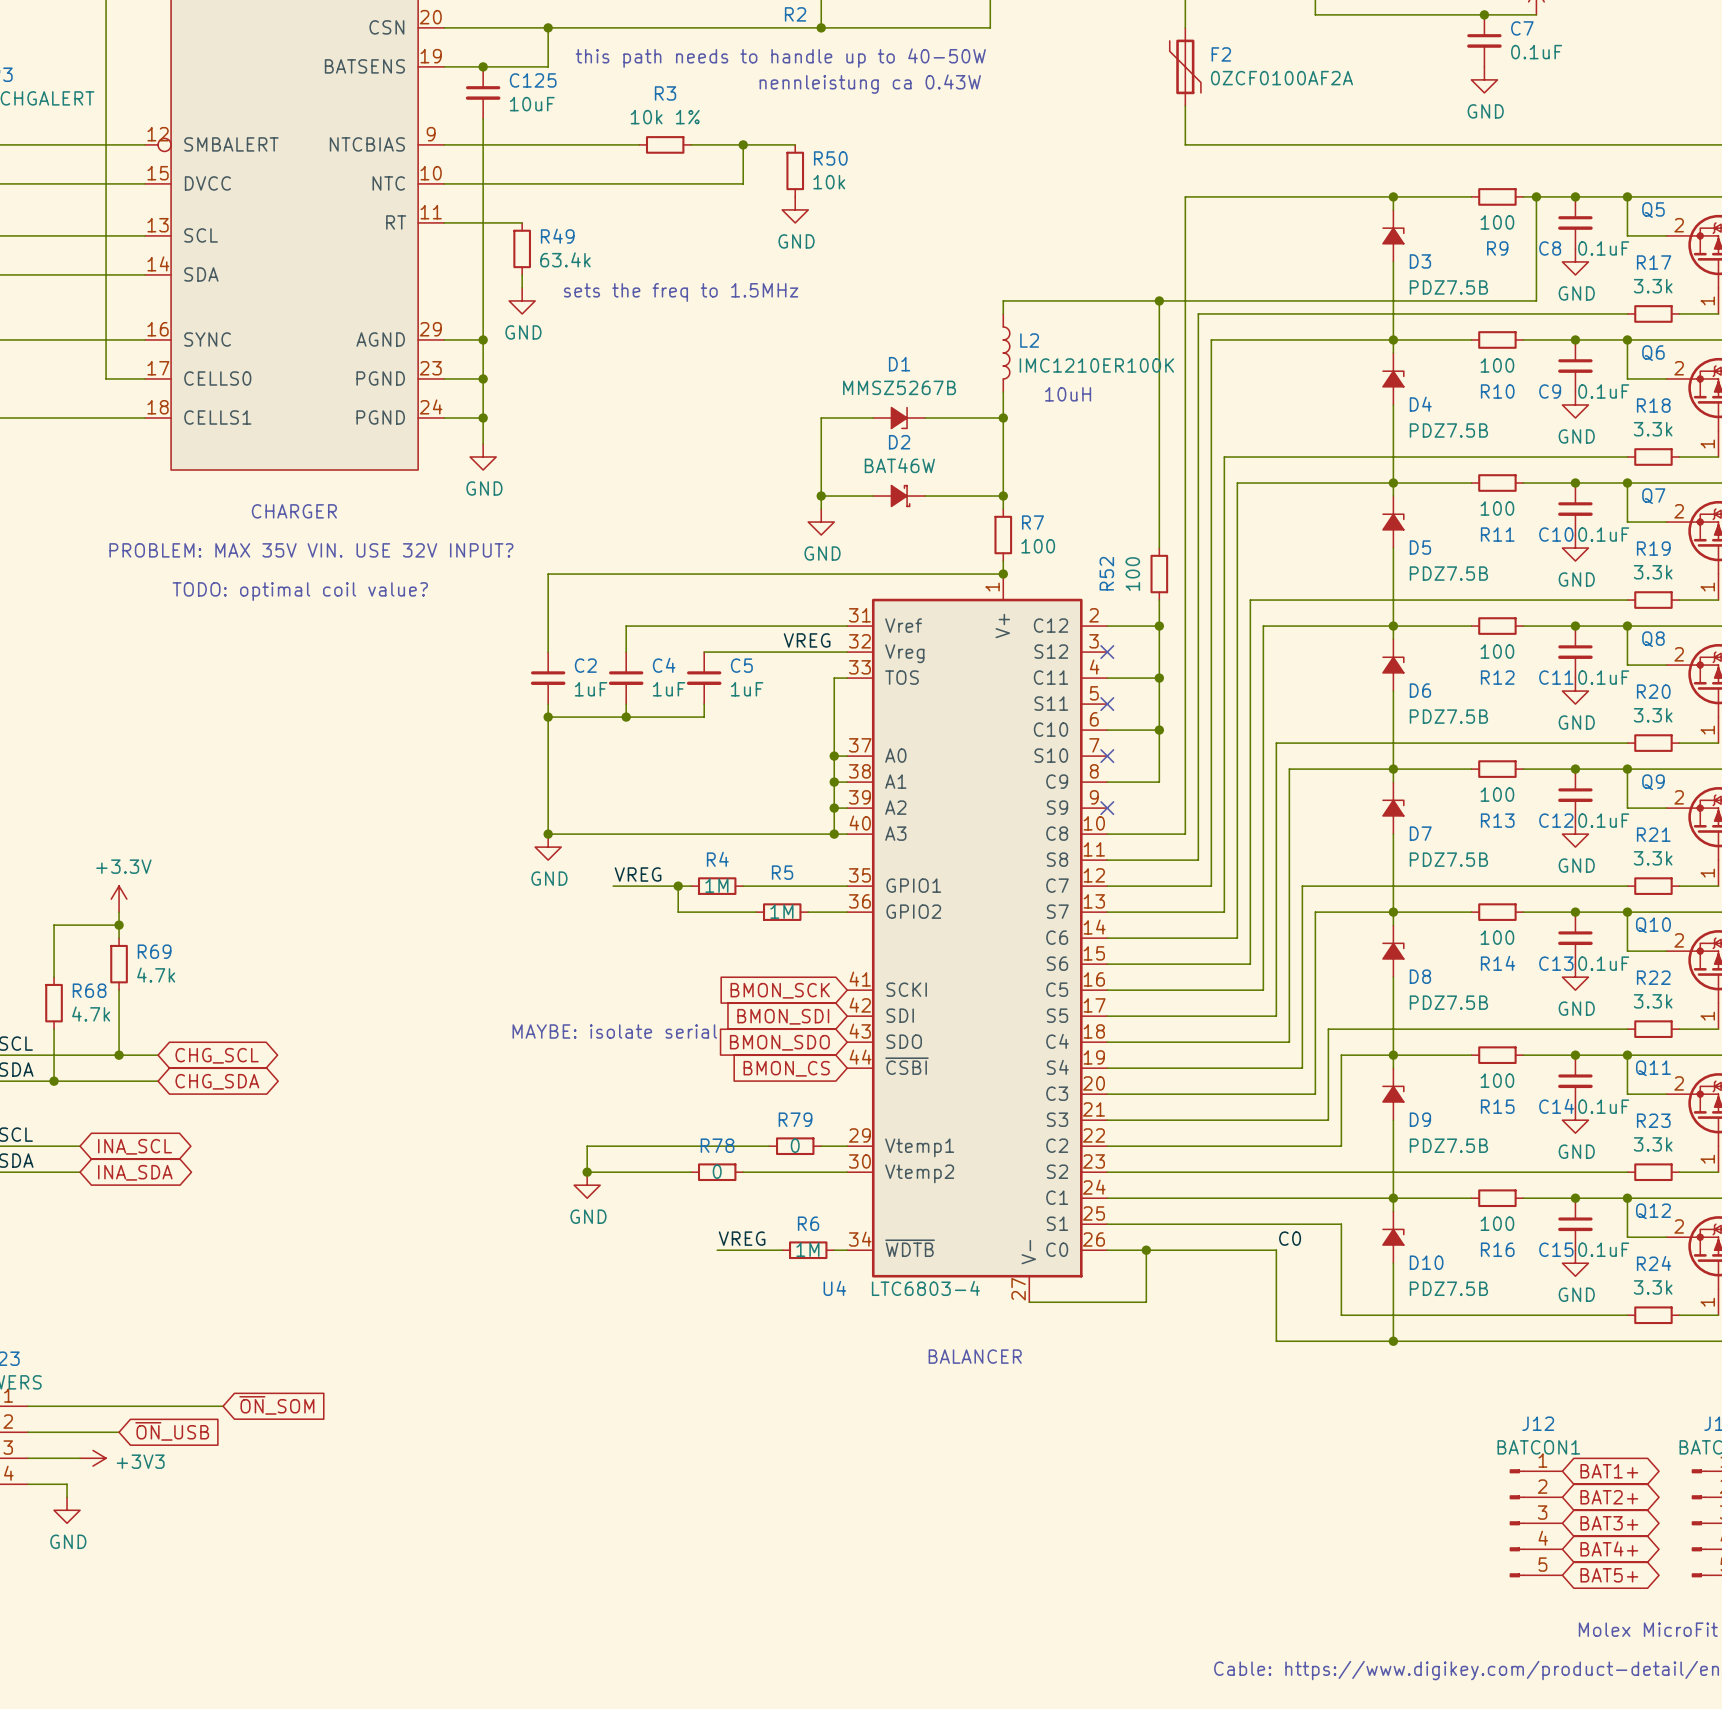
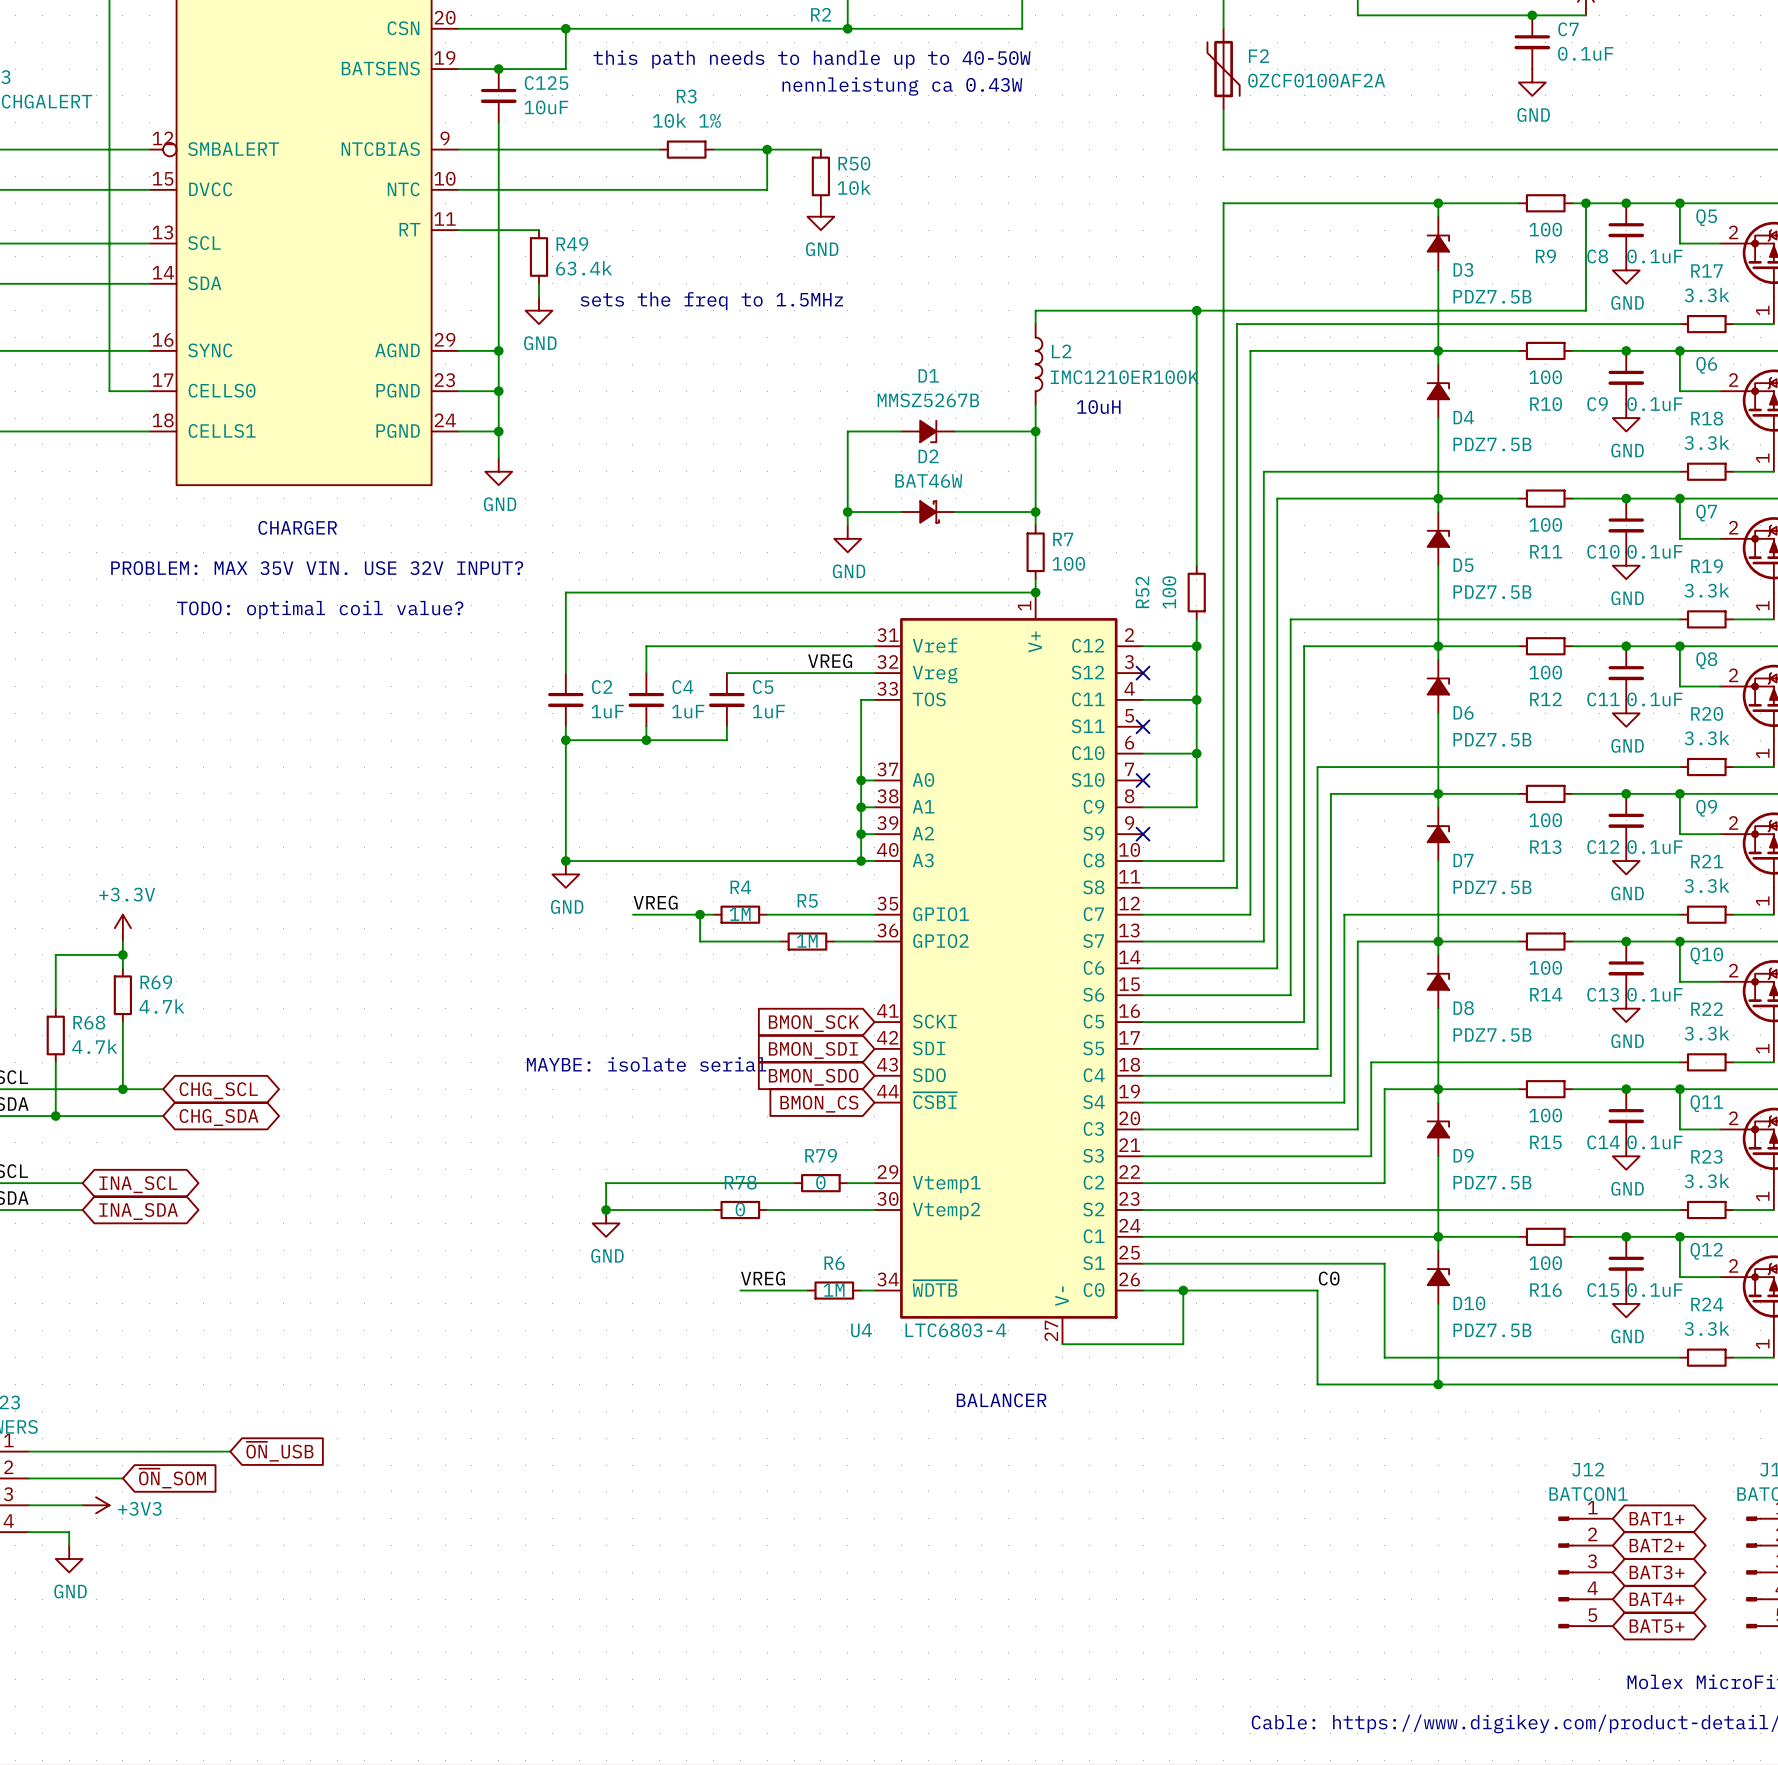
global label: ~{ON}_SOM (276, 1405) -> ~{ON}_USB (279, 1451)
global label: ~{ON}_USB (172, 1431) -> ~{ON}_SOM (172, 1478)

